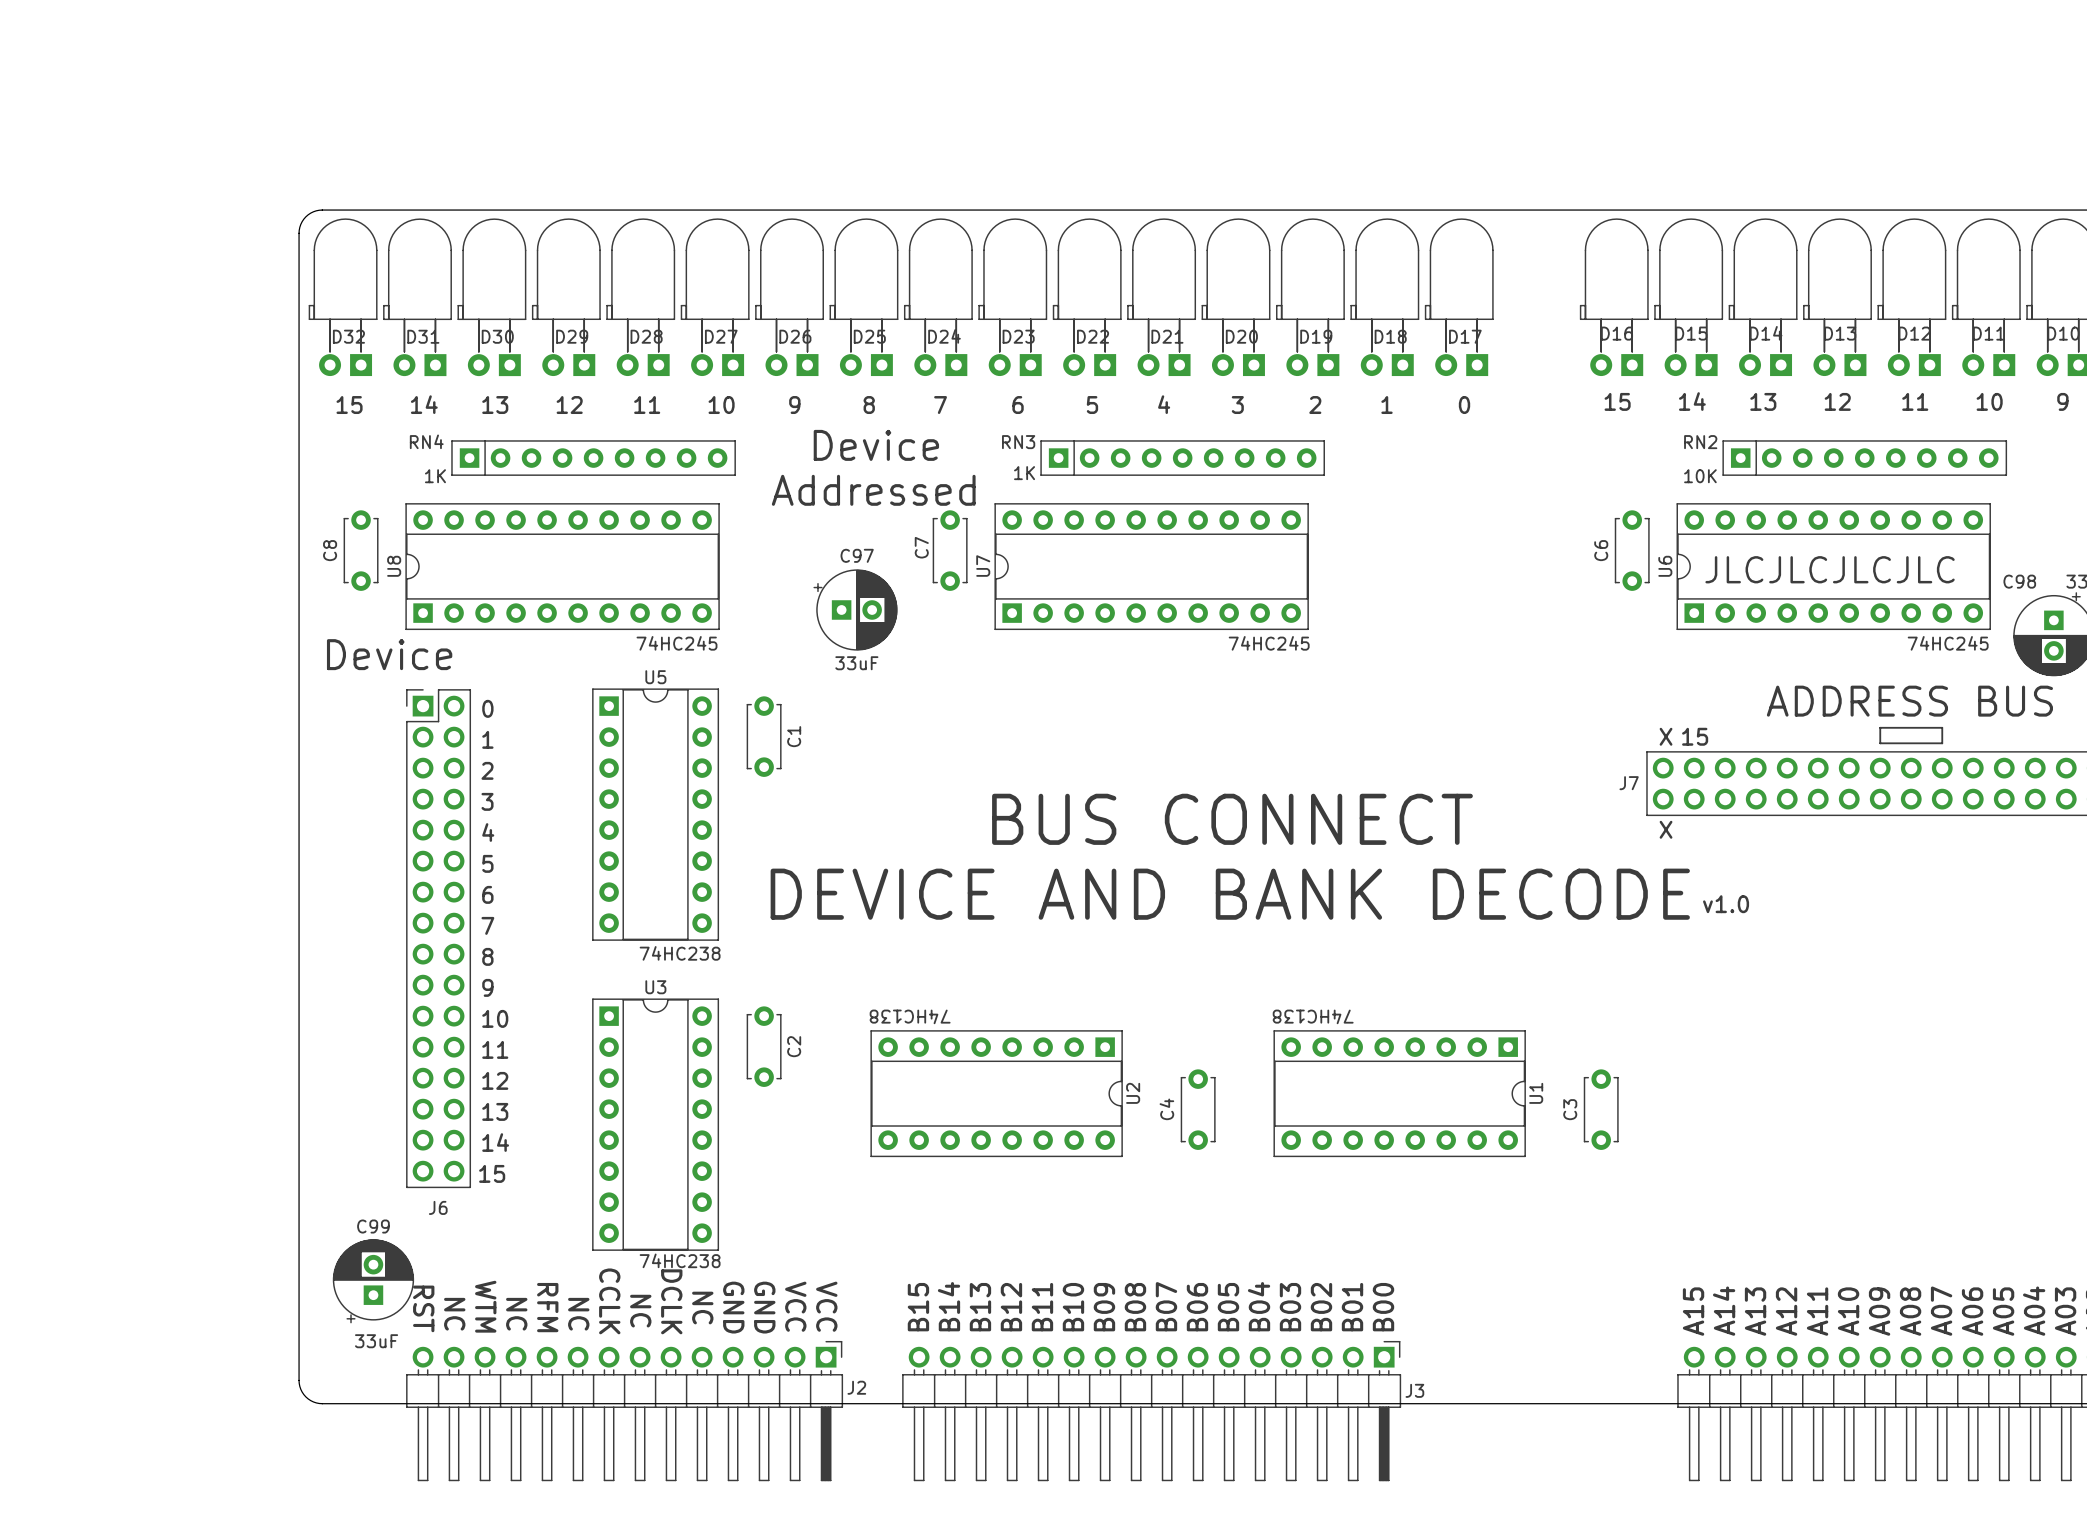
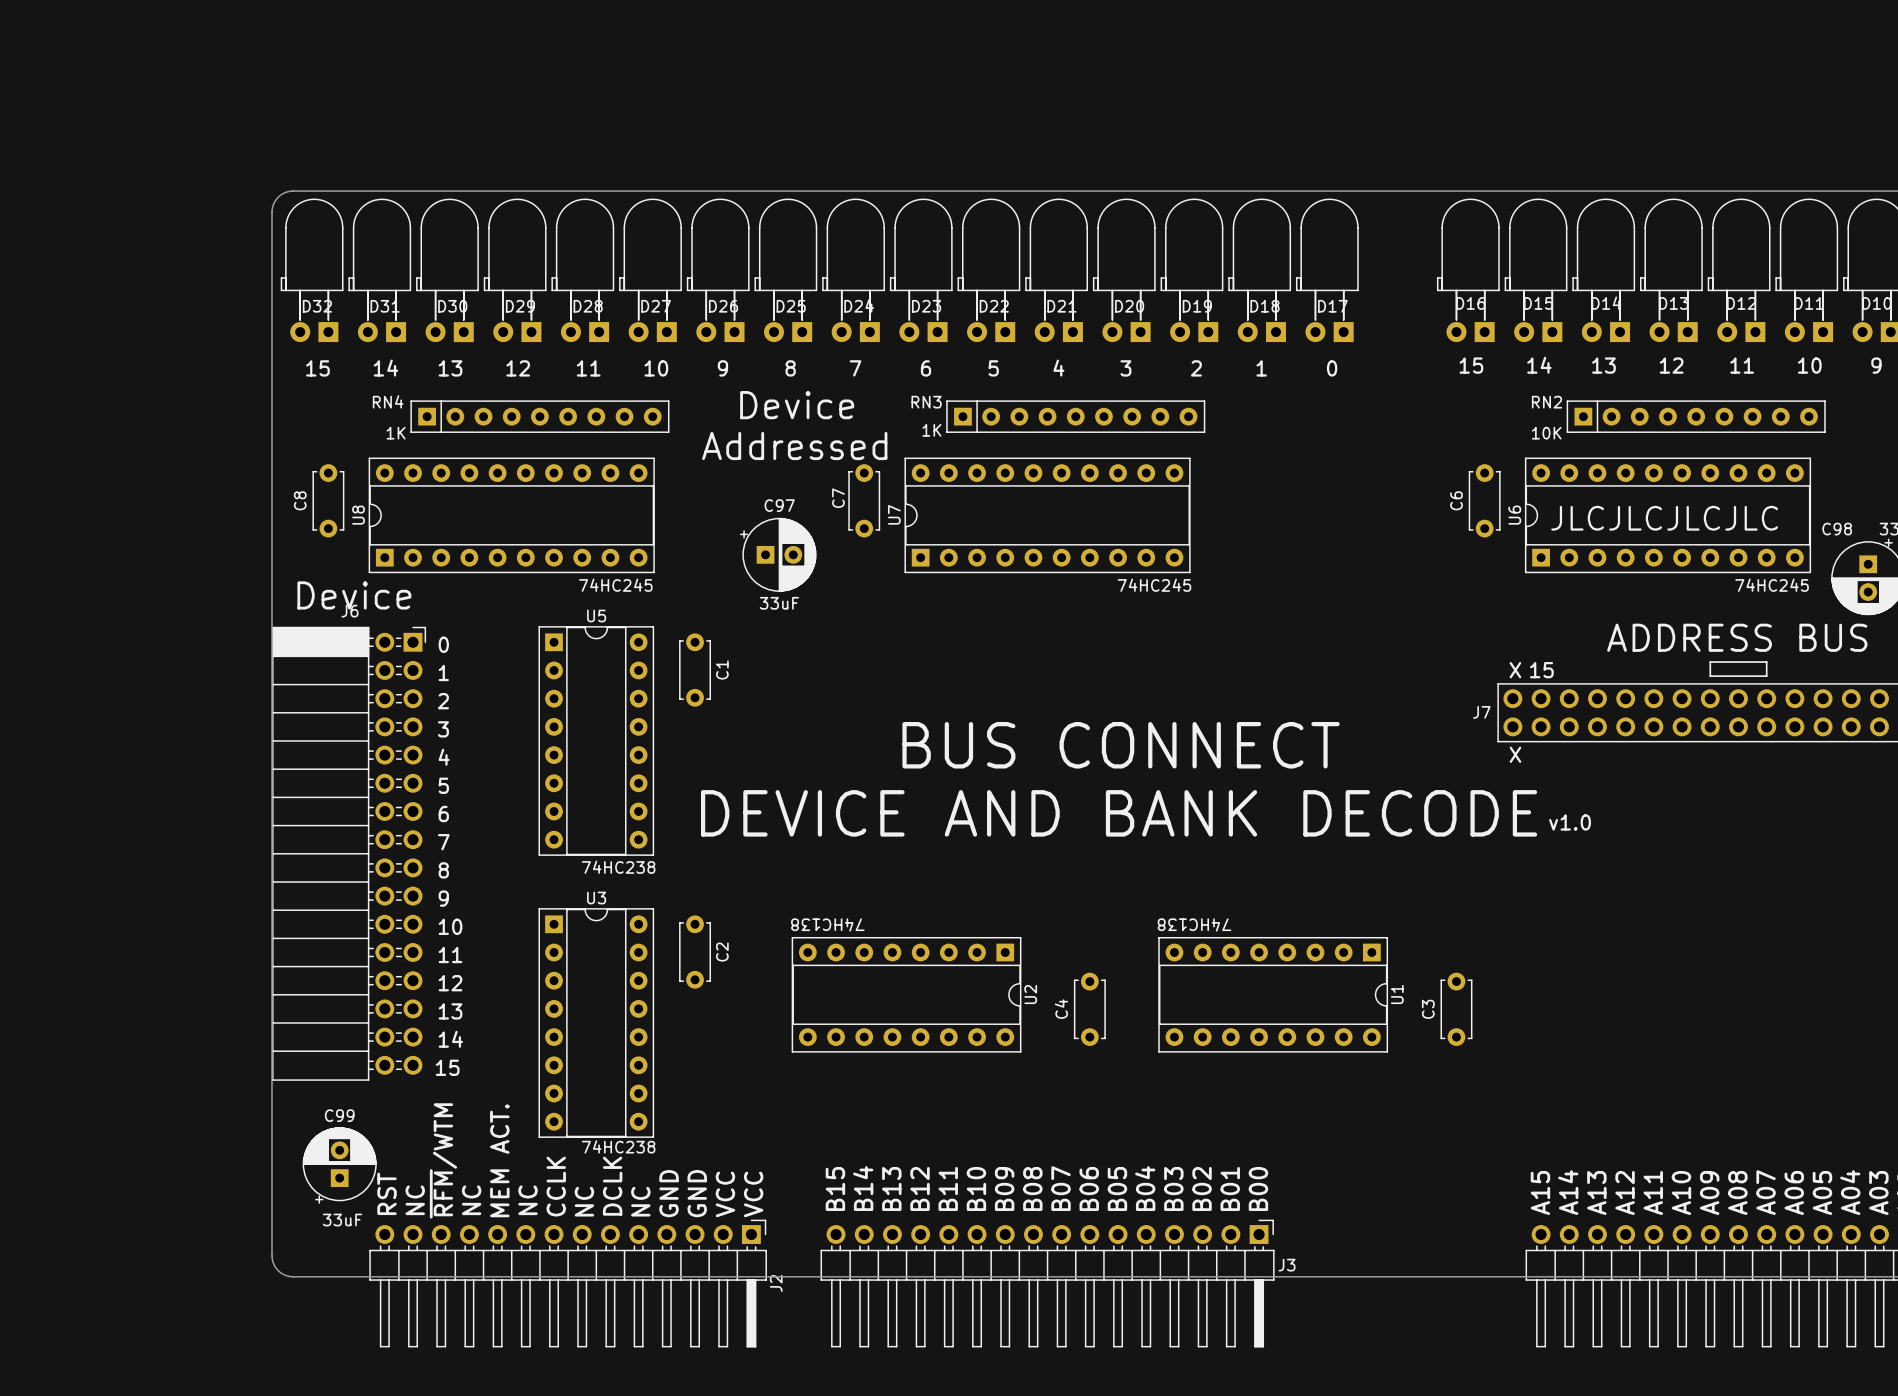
J6 footprint: [406, 689, 472, 1189] -> [272, 626, 427, 1081]
J6 name position: J6 (438, 1207) -> J6 (350, 611)
J2 footprint: [406, 1340, 844, 1482] -> [369, 1219, 767, 1348]

